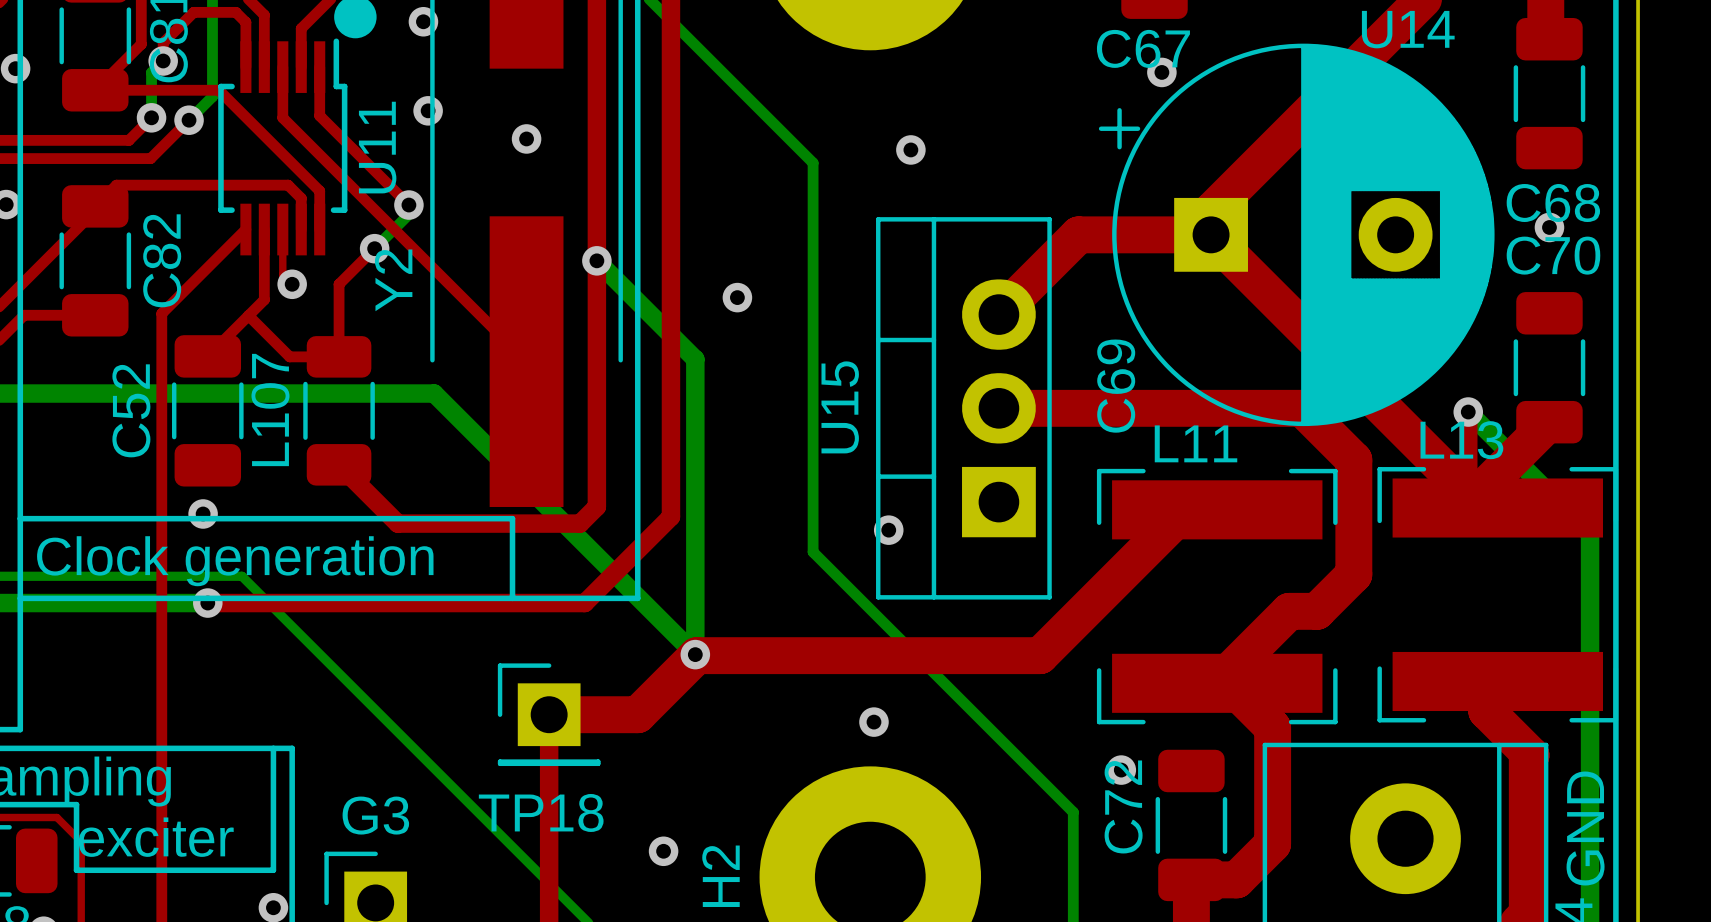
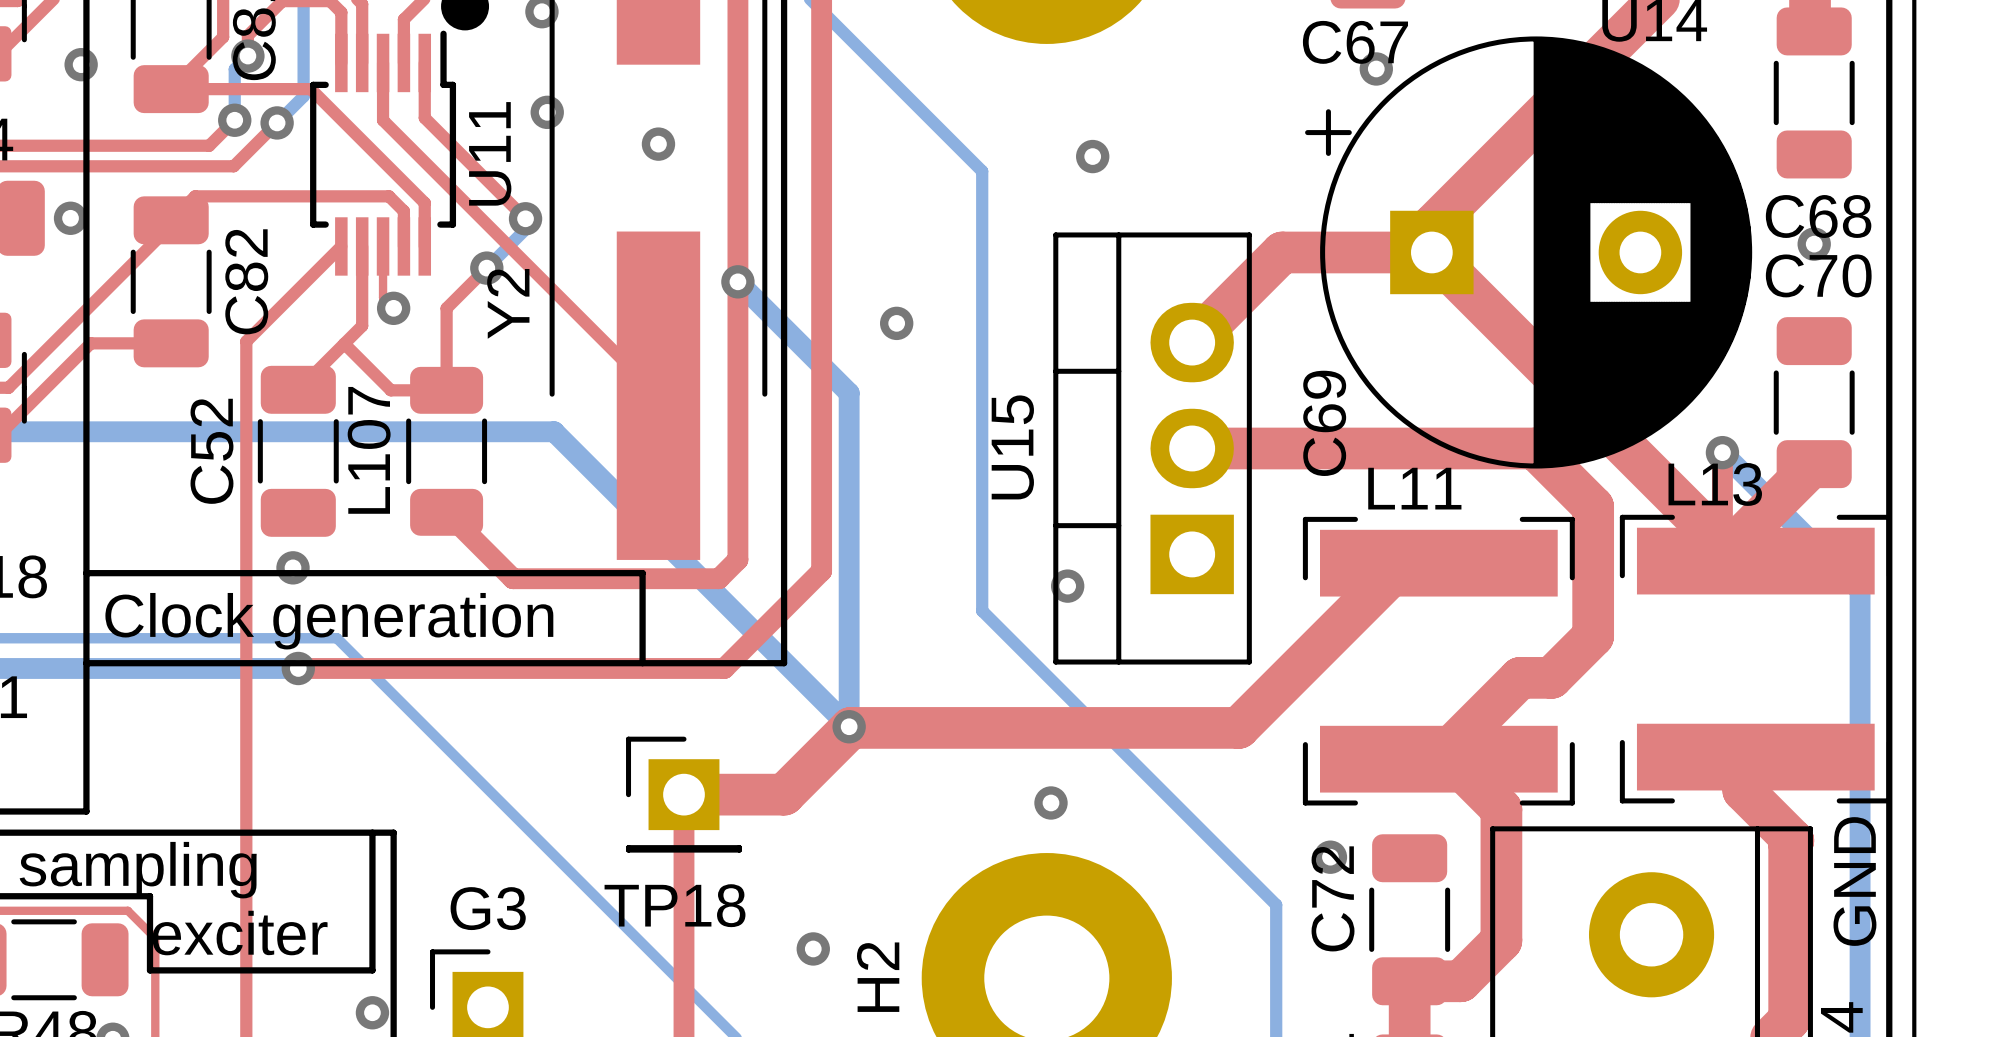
text position: GND (1585, 828) -> GND (1854, 881)

